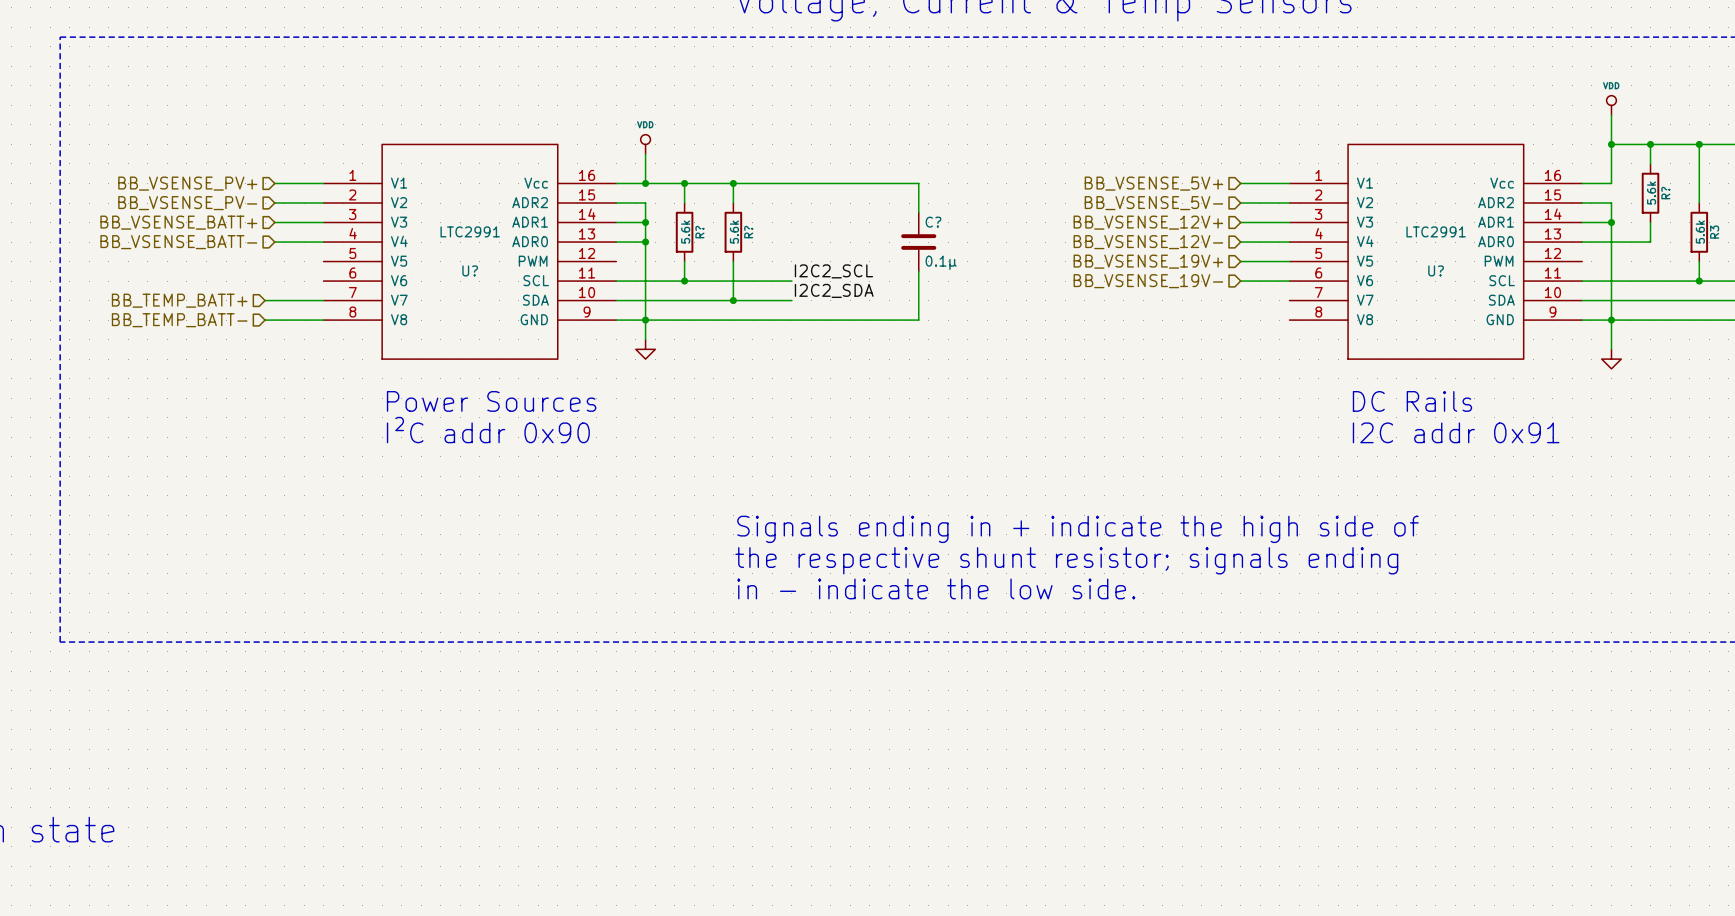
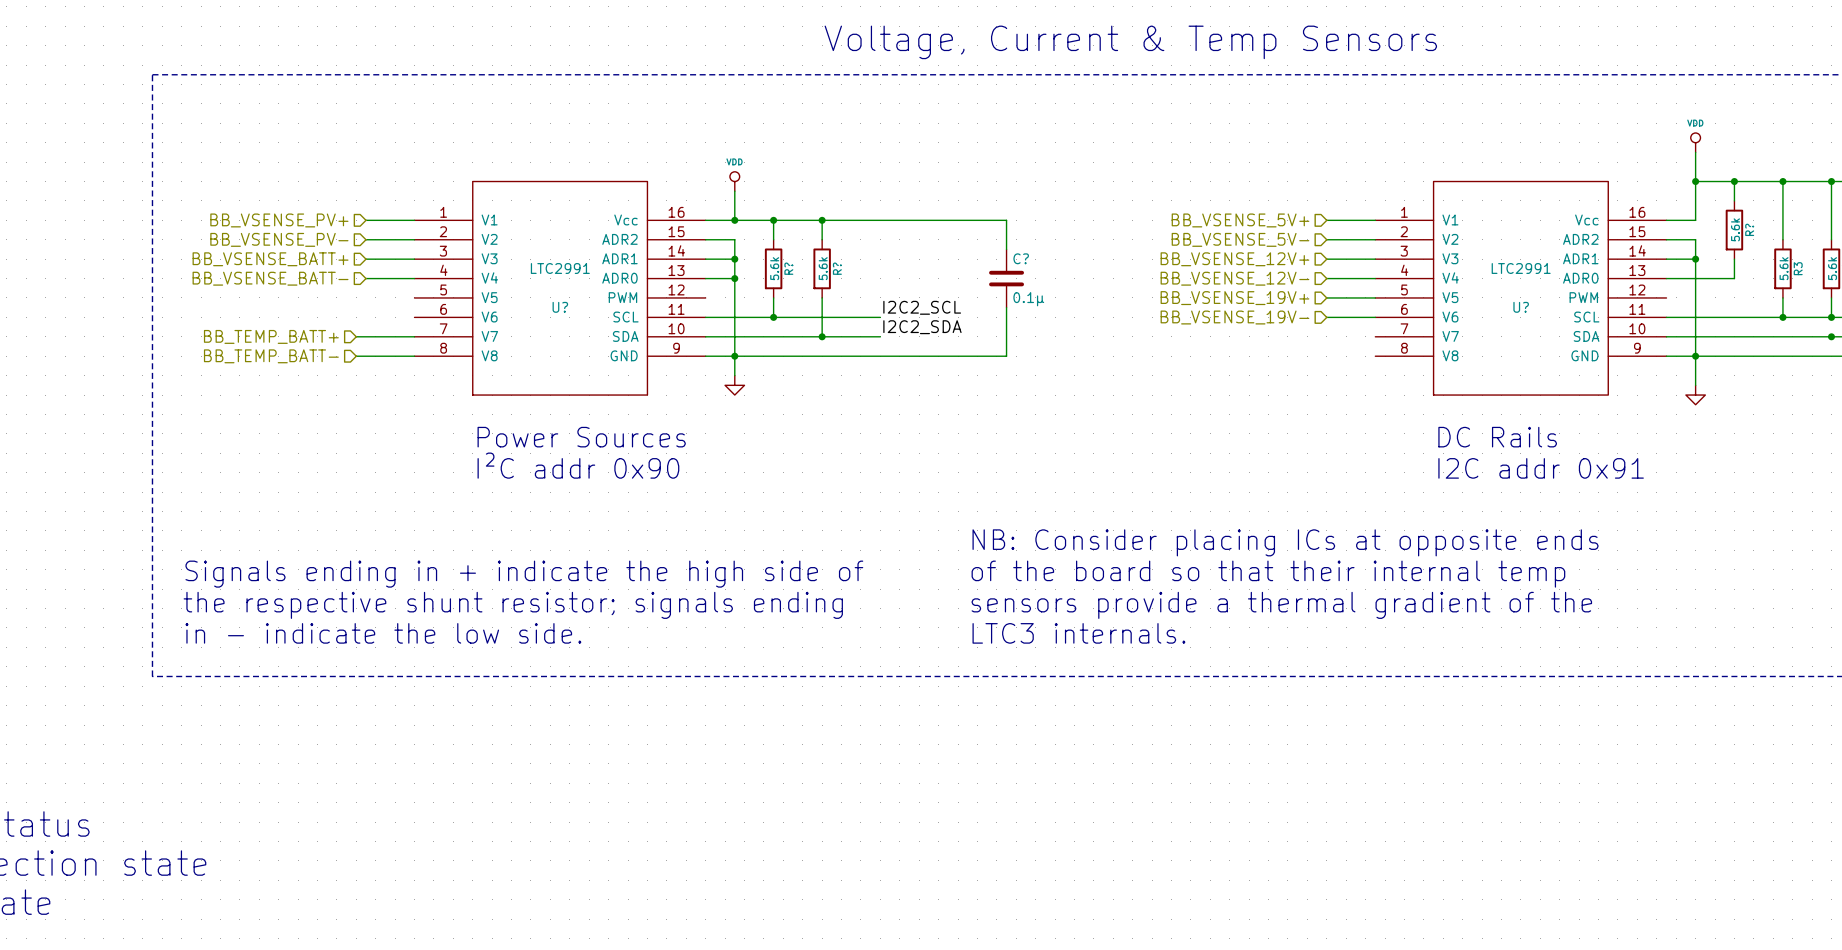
text: none -> NB: Consider placing ICs at opposite ends (1285, 542)
text: Signals ending in + indicate the high side of (1077, 529) -> none
text: none -> Signals ending in + indicate the high side of (524, 574)
text: none -> of the board so that their internal temp (1268, 574)
text: the respective shunt resistor; signals ending (1066, 560) -> none
text: none -> the respective shunt resistor; signals ending (513, 605)
text: none -> sensors provide a thermal gradient of the (1281, 605)
text: in - indicate the low side. (936, 588) -> none
text: none -> in - indicate the low side. (383, 633)
text: none -> LTC3 internals. (1078, 633)

